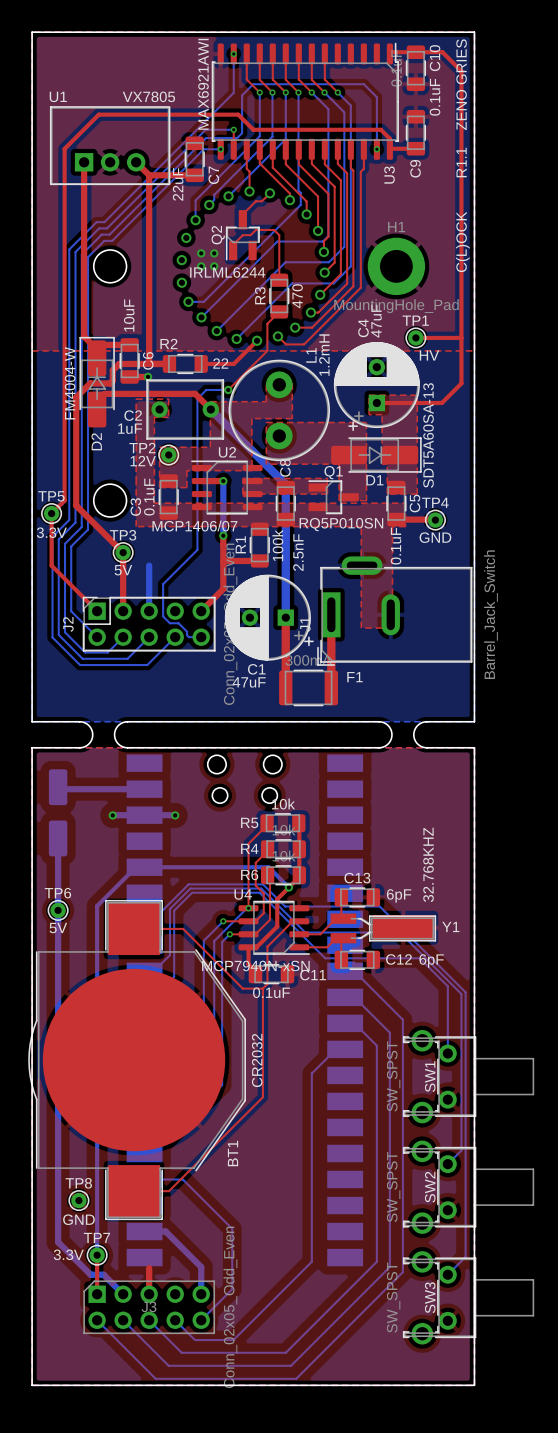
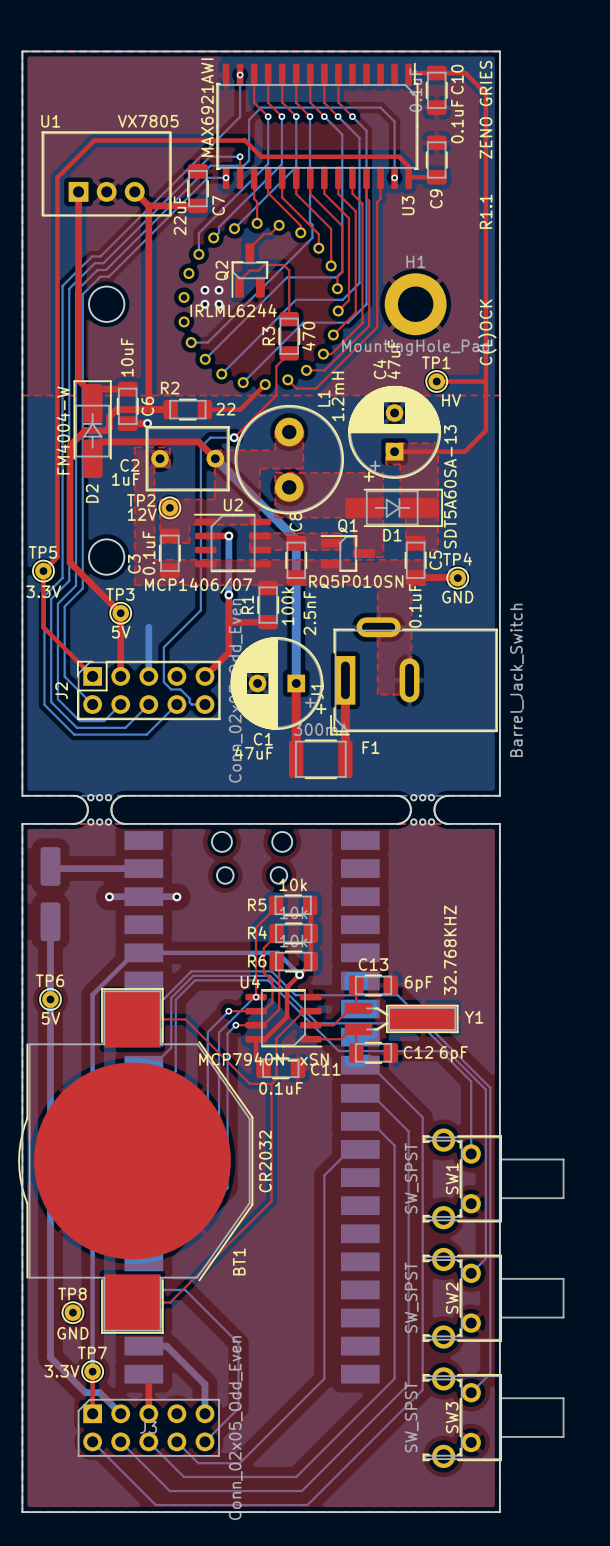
part: none -> (99, 809)
part: none -> (422, 809)

